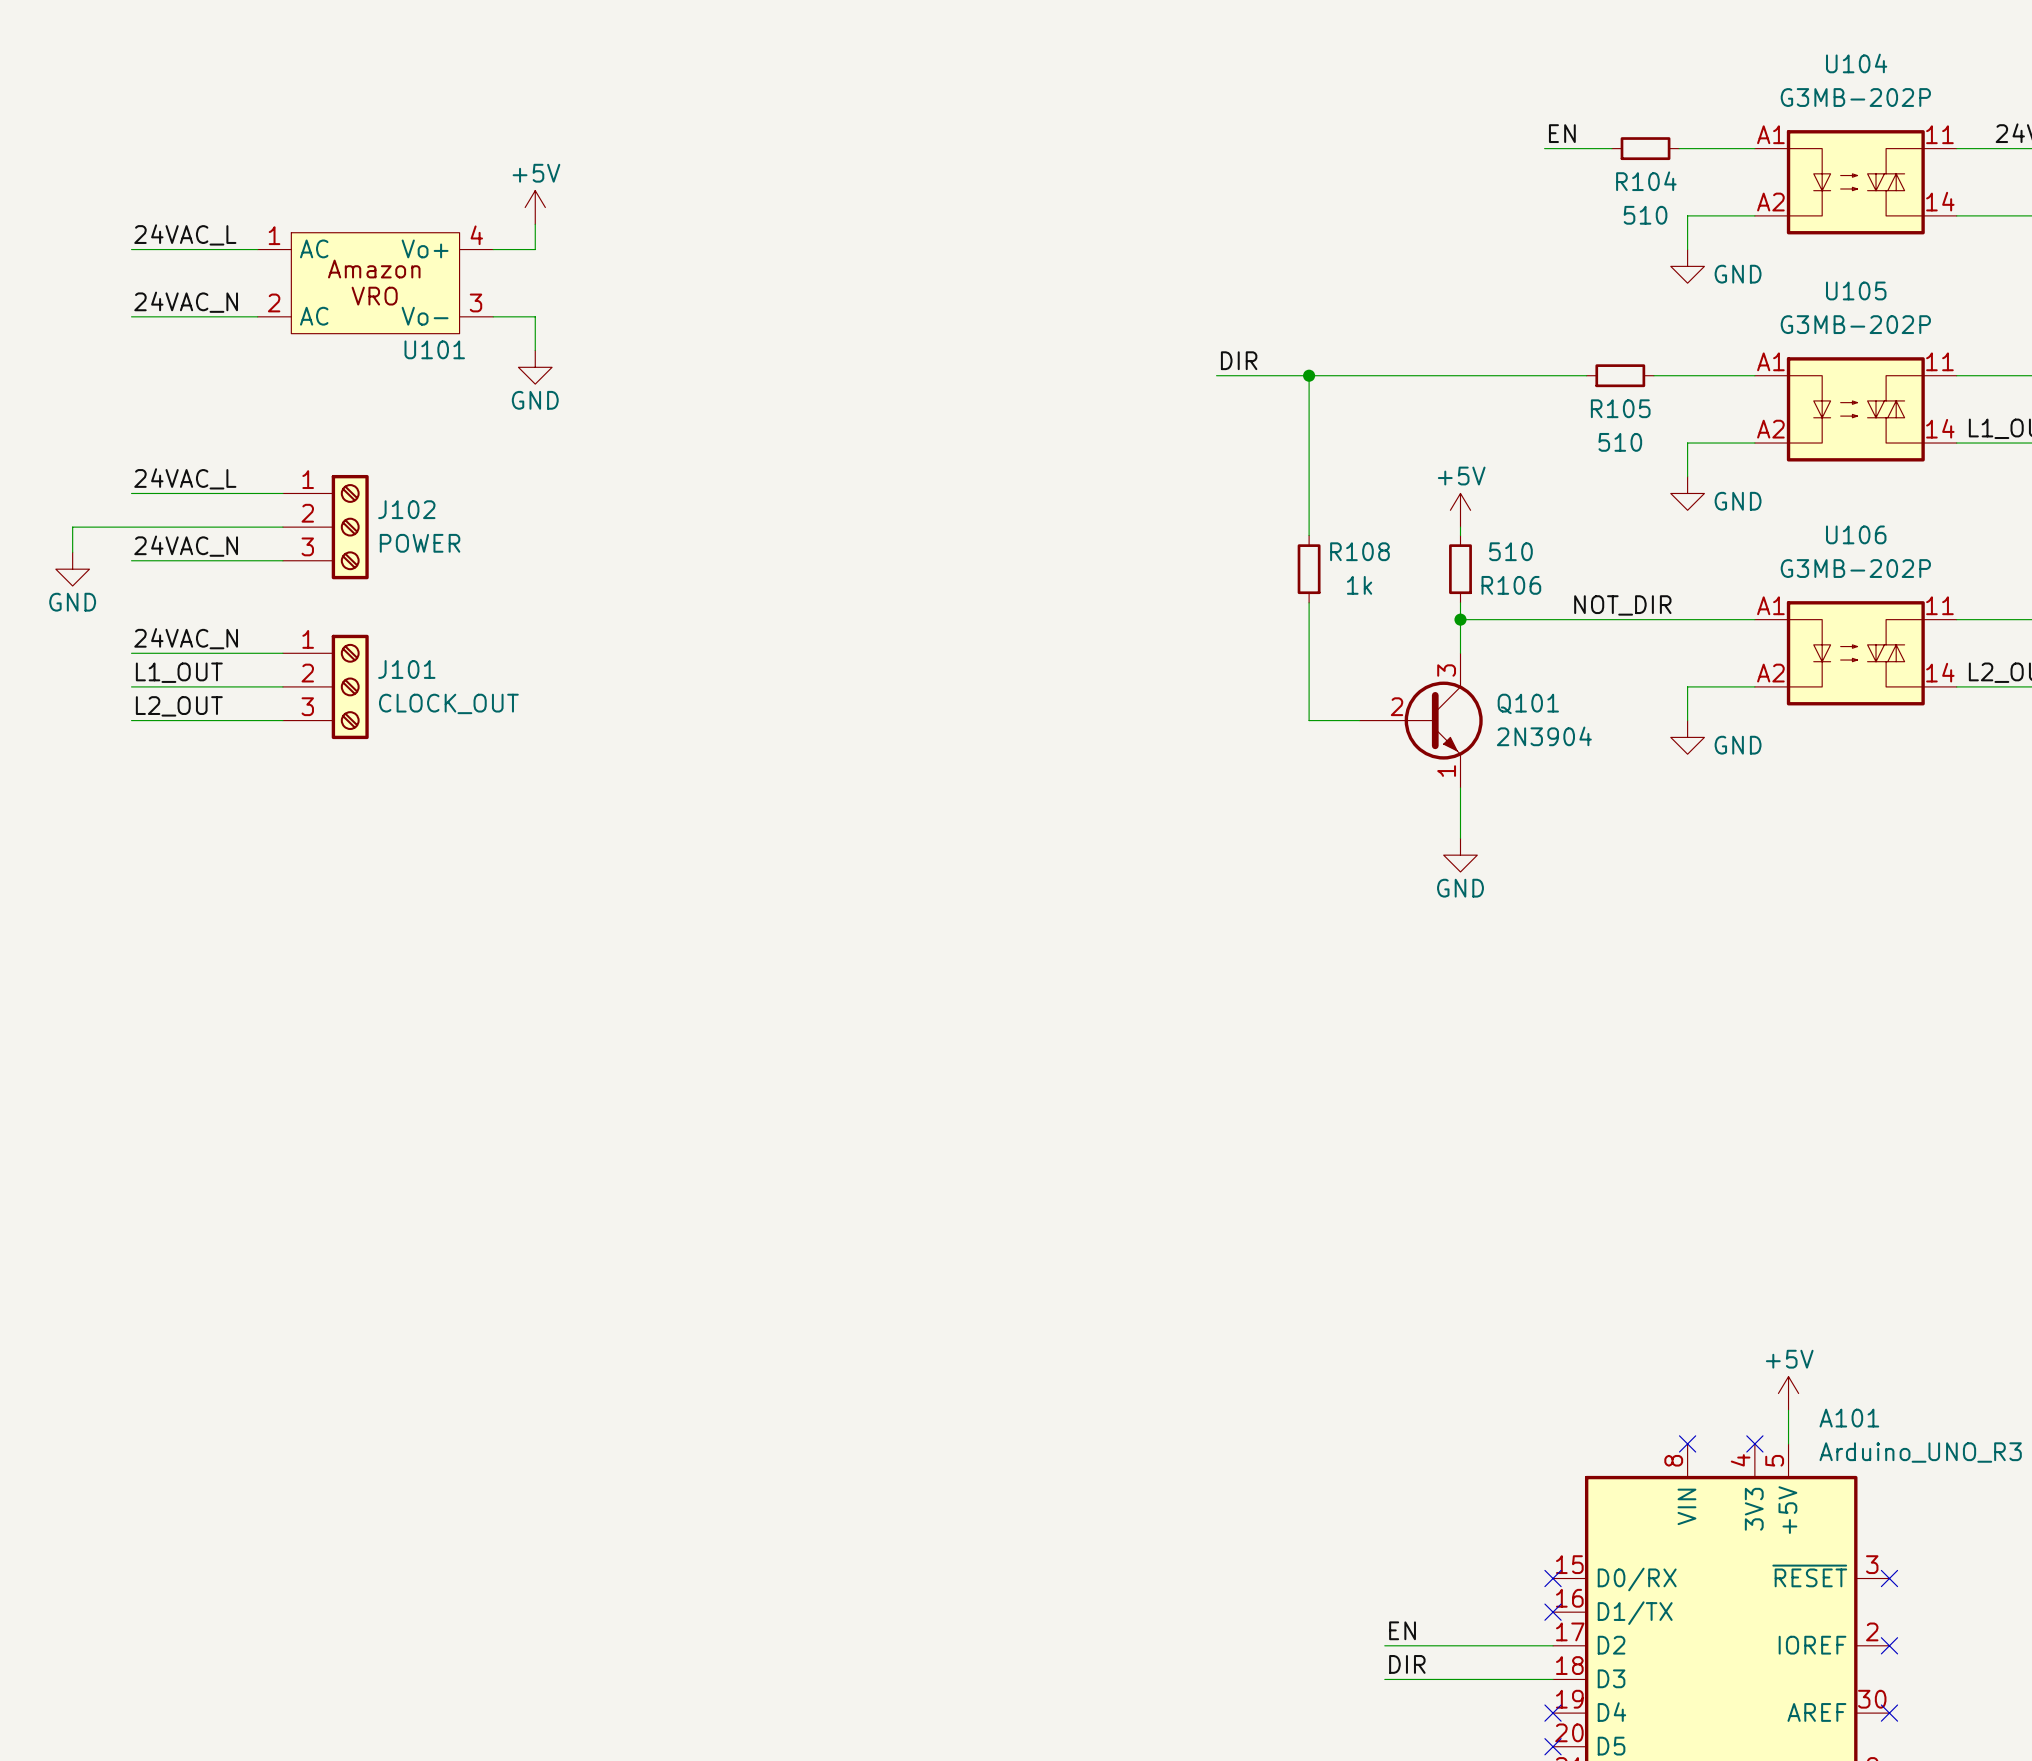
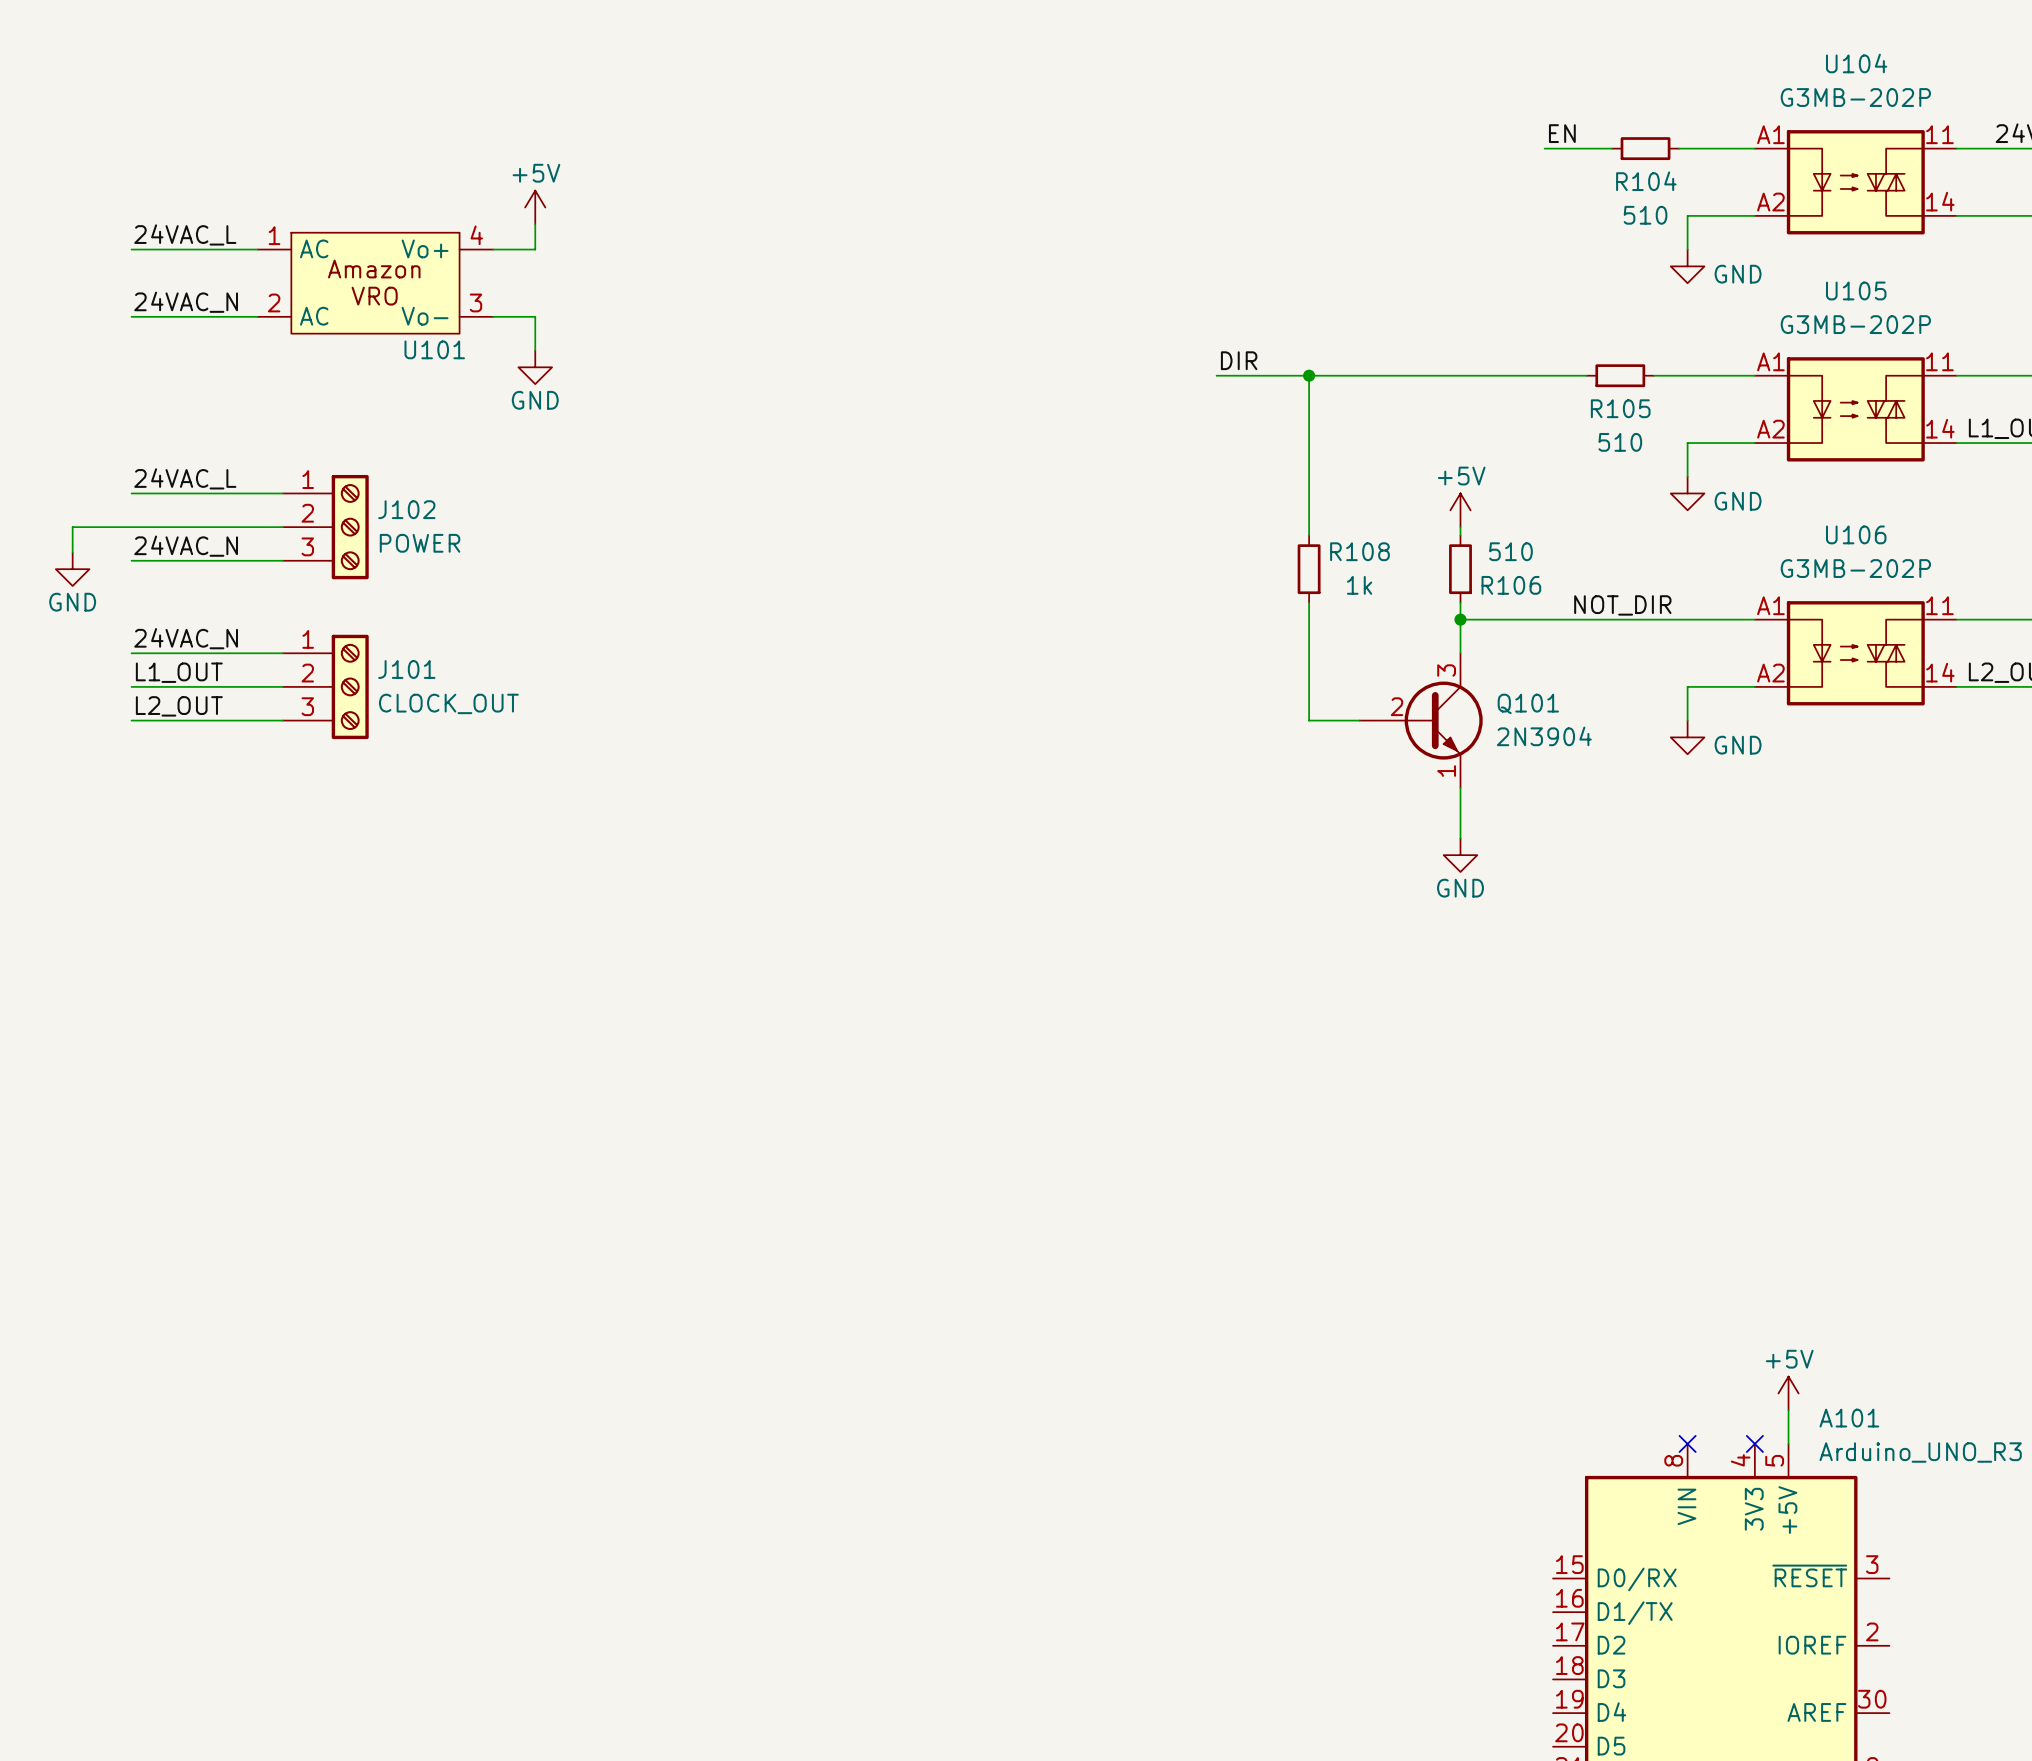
no-connect mark: (1553, 1578) -> none
no-connect mark: (1889, 1578) -> none
no-connect mark: (1553, 1612) -> none
label: EN (1402, 1630) -> none
wire: (1384, 1645) (1553, 1645) -> none
no-connect mark: (1889, 1645) -> none
label: DIR (1407, 1664) -> none
wire: (1384, 1679) (1553, 1679) -> none
no-connect mark: (1553, 1713) -> none
no-connect mark: (1889, 1713) -> none
no-connect mark: (1553, 1746) -> none

